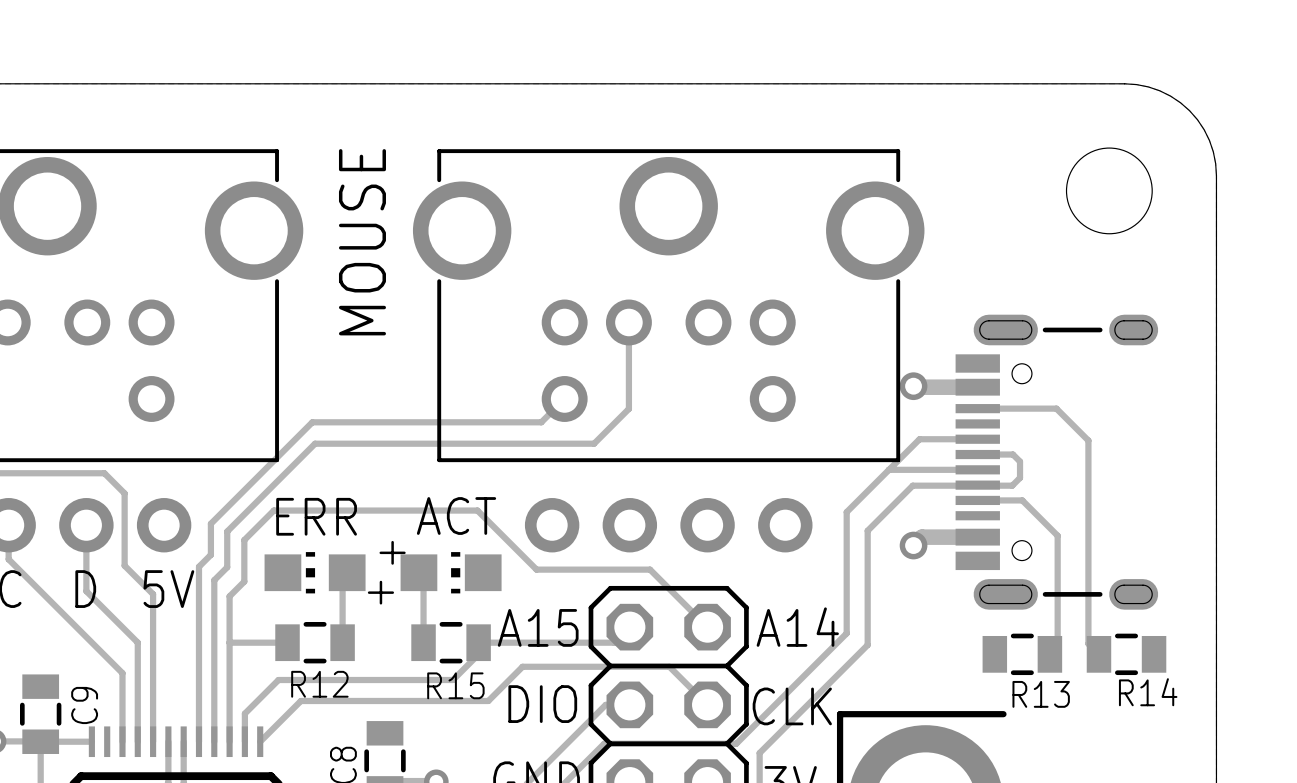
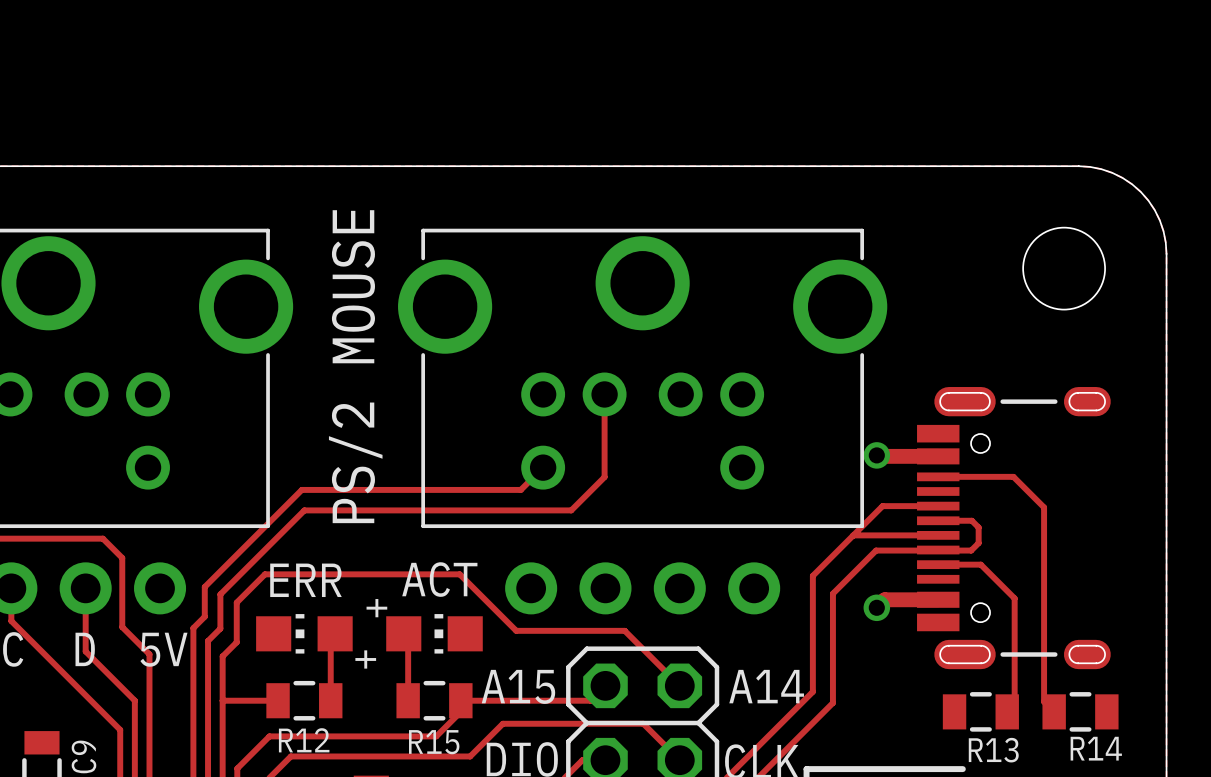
text: MOUSE (362, 242) -> PS/2 MOUSE (355, 366)

